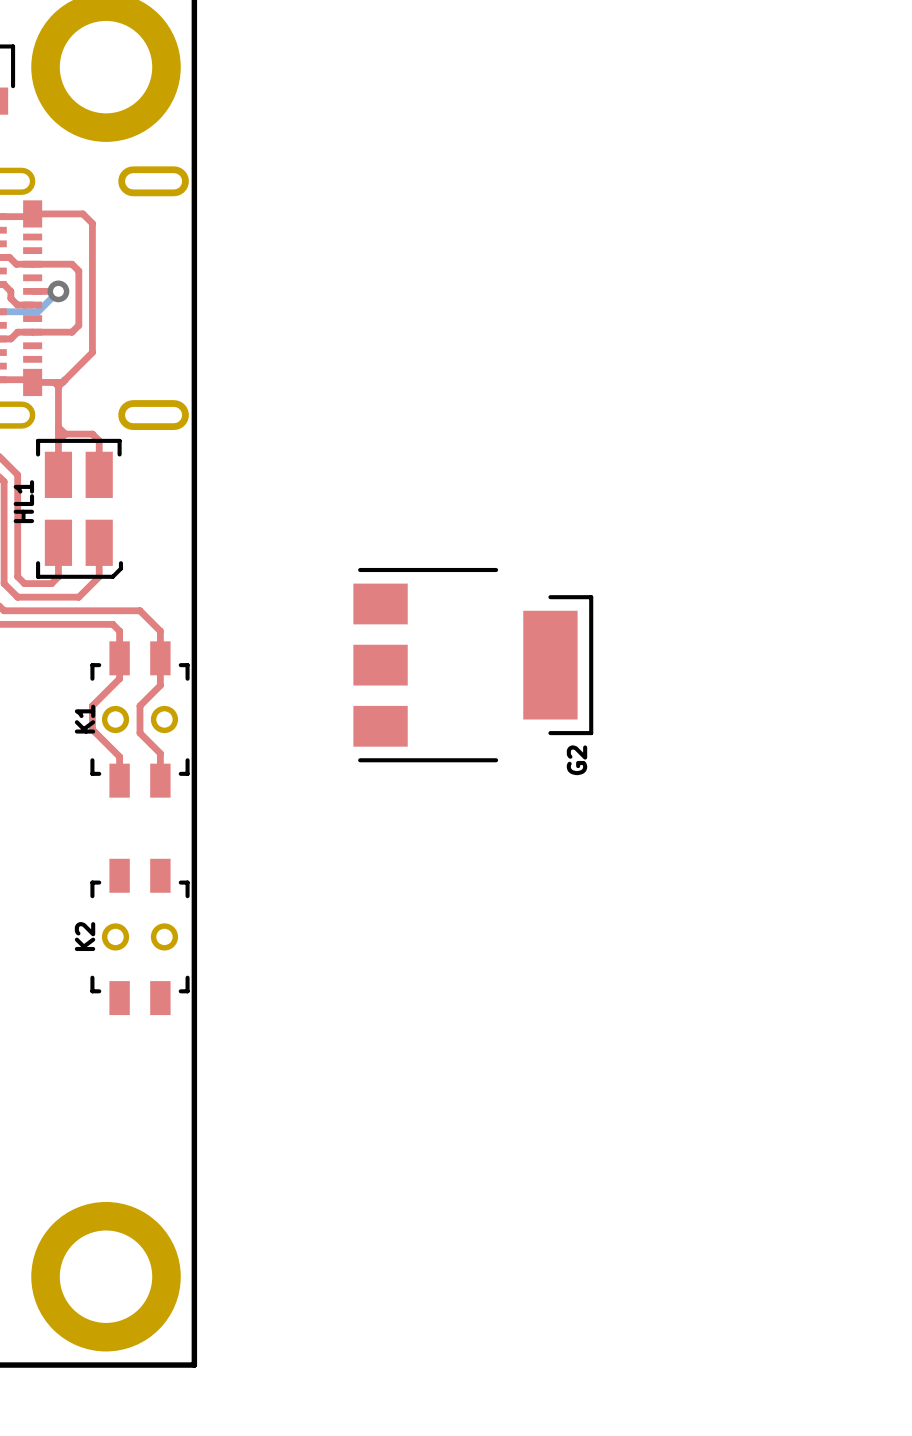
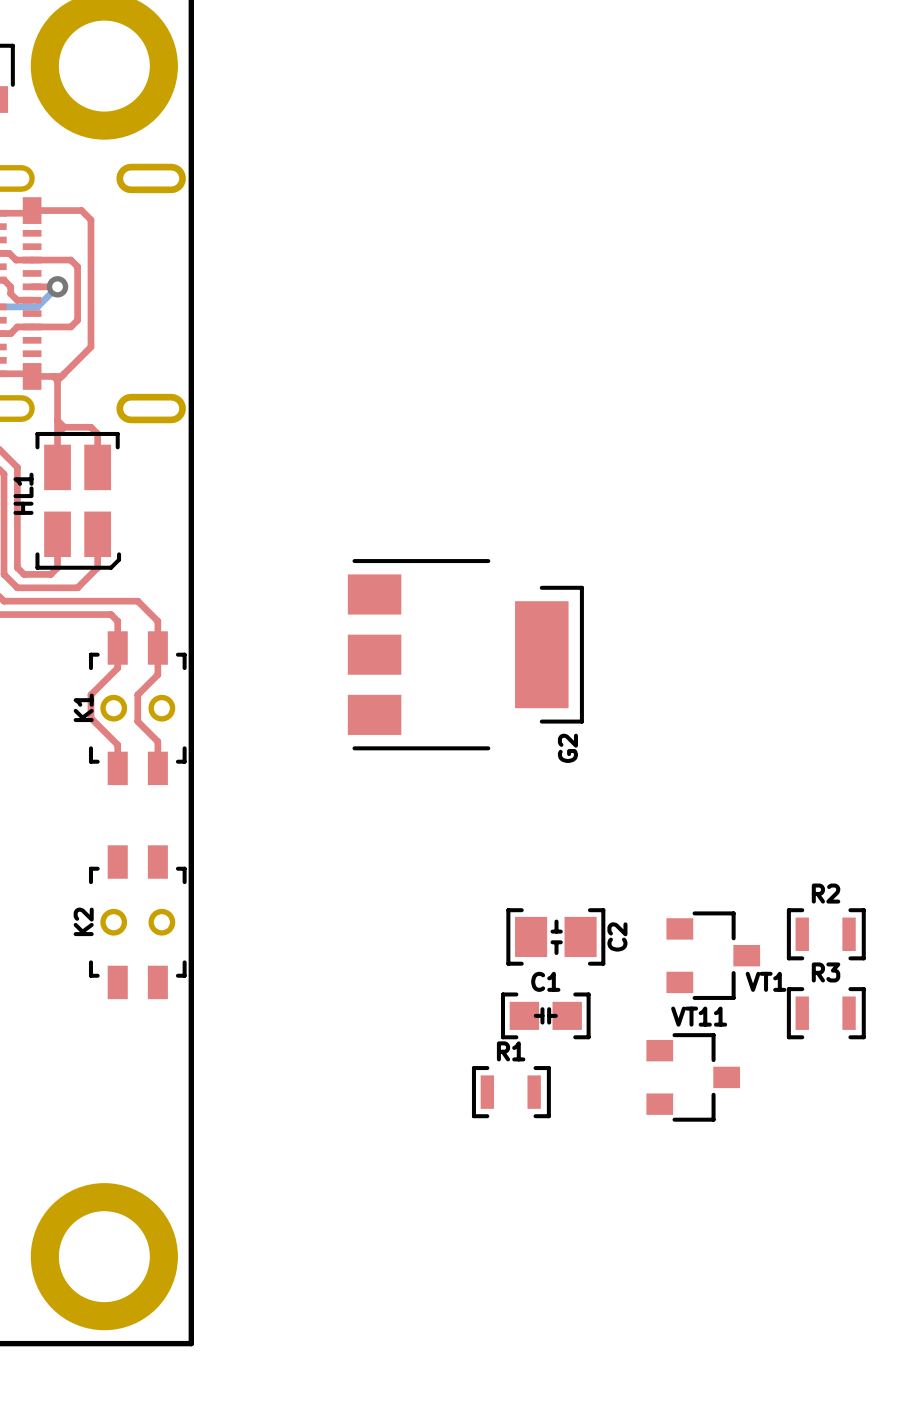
R2: none -> (826, 934)
C2: none -> (555, 936)
VT1: none -> (713, 955)
R3: none -> (826, 1013)
C1: none -> (545, 1015)
VT11: none -> (693, 1077)
R1: none -> (511, 1092)

